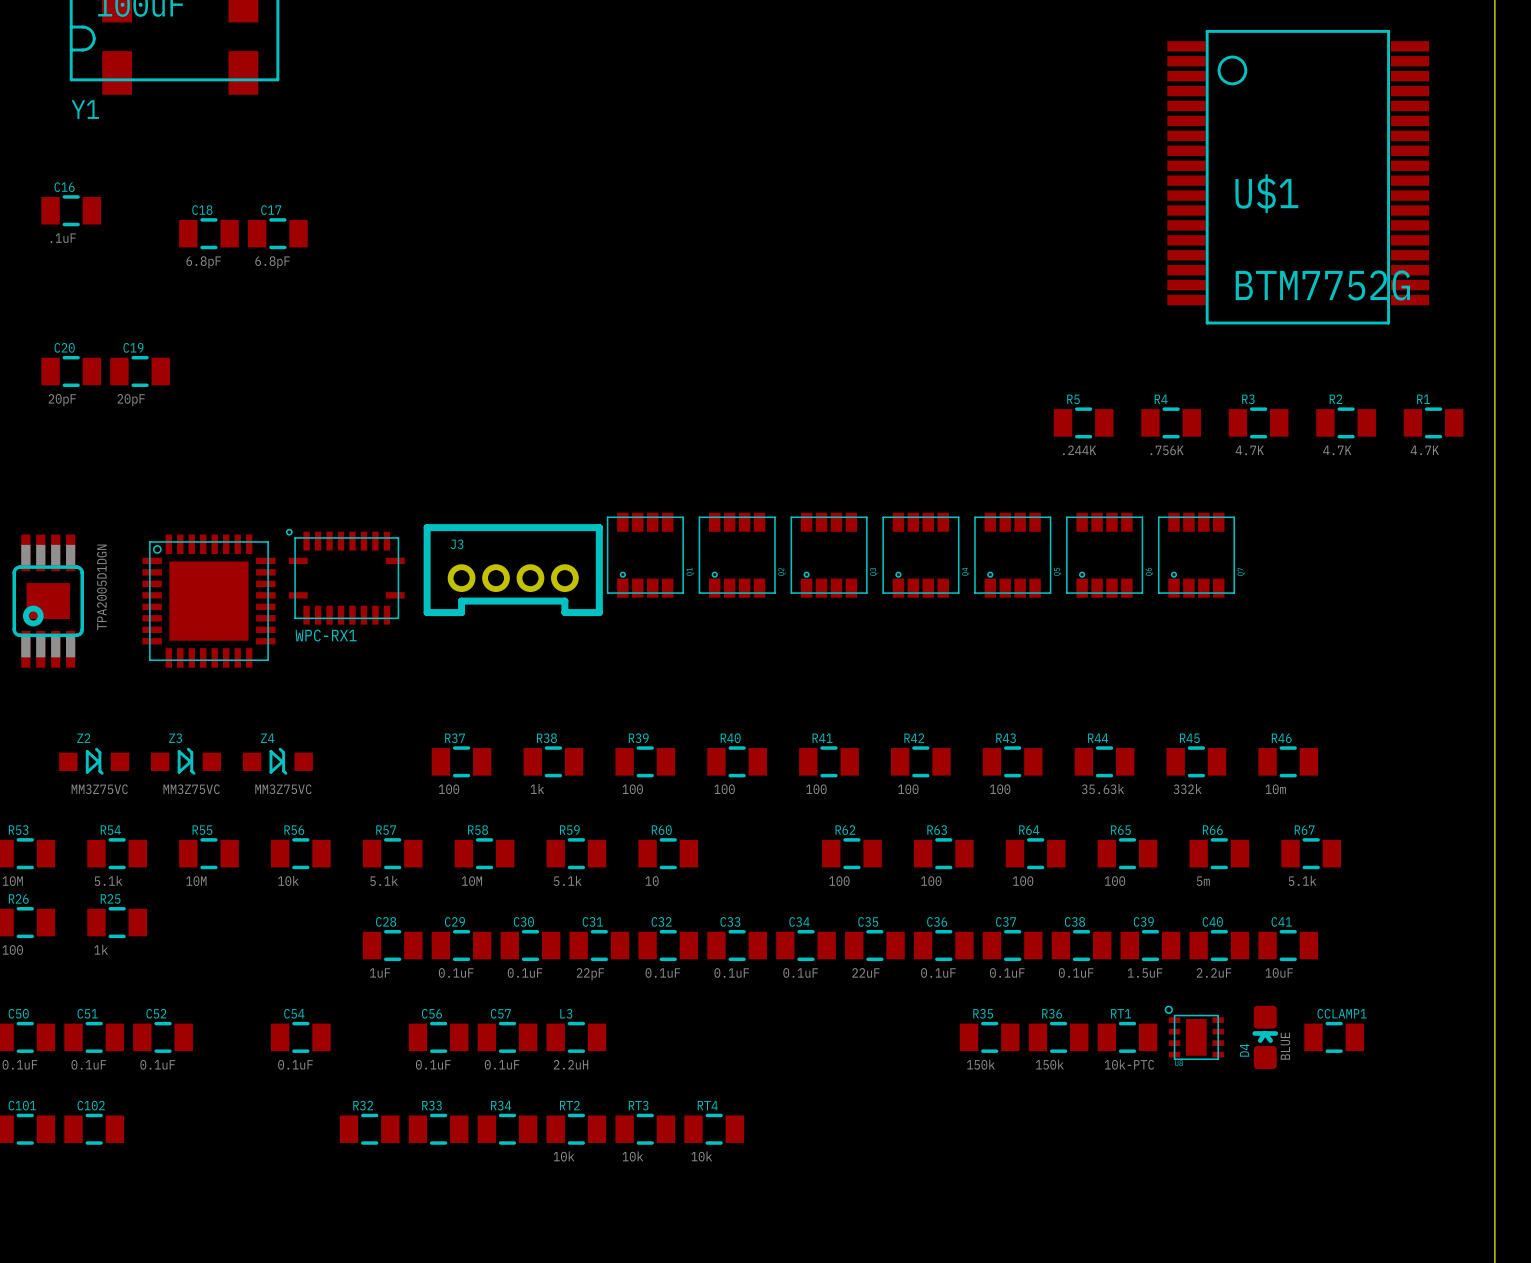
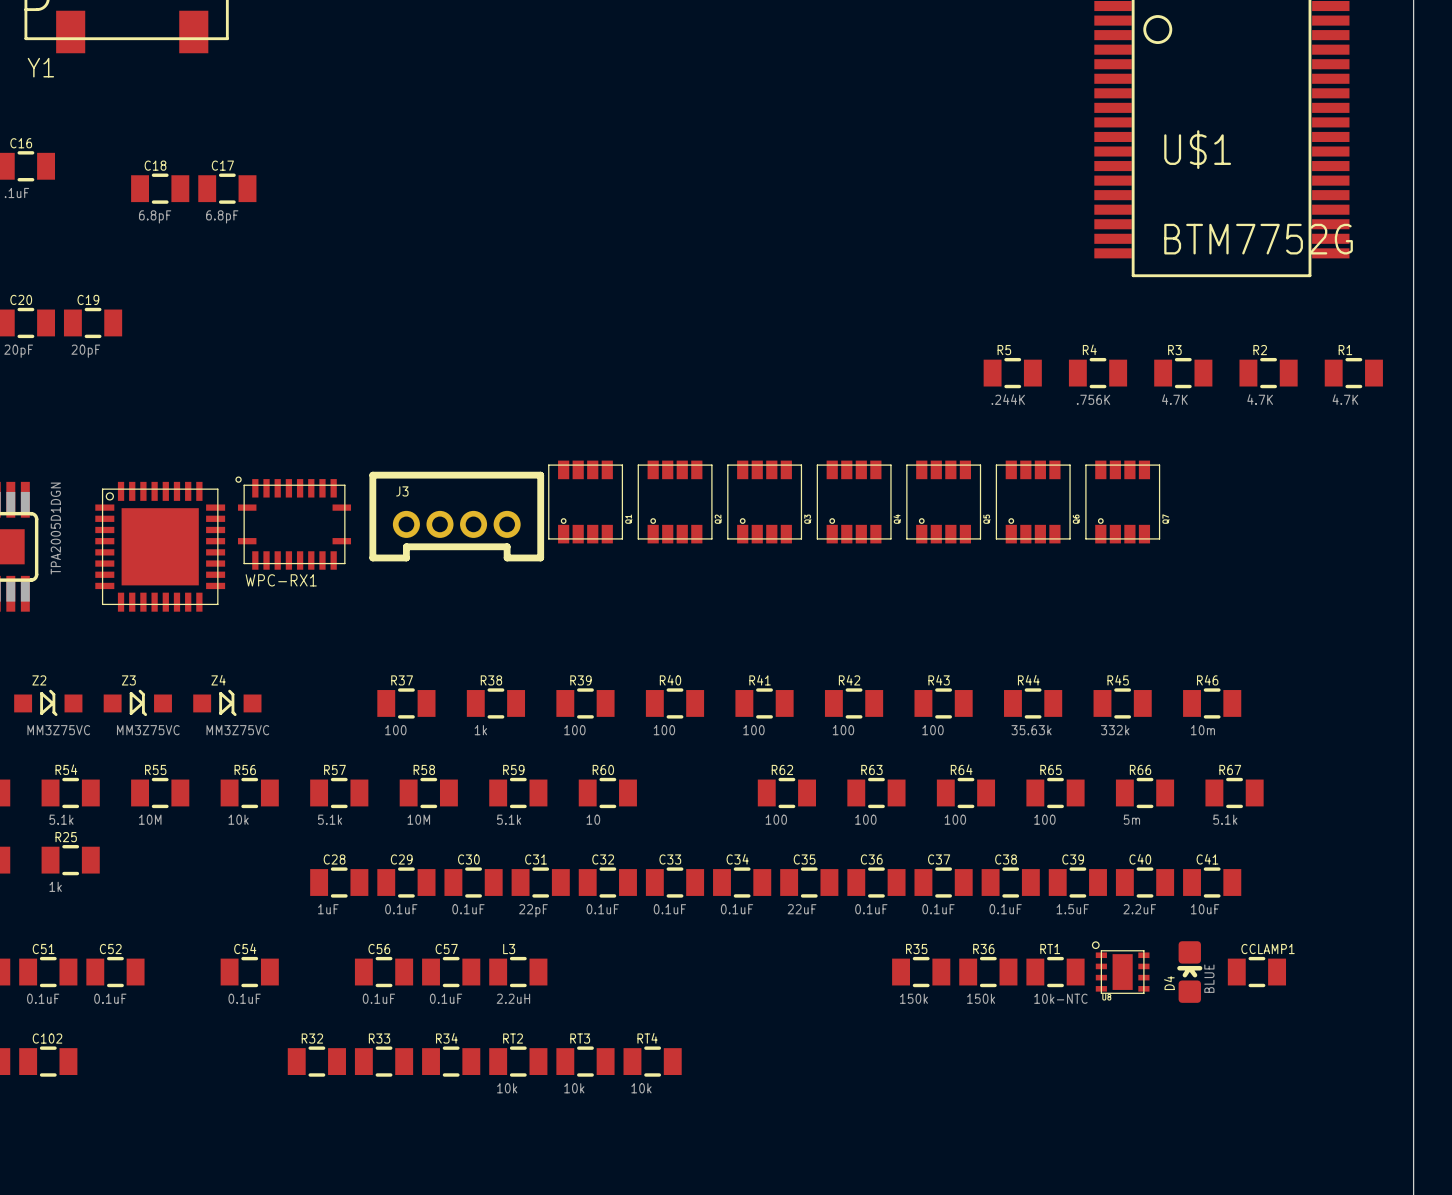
RT1 value: 10k-PTC (1129, 1064) -> 10k-NTC (1060, 998)

